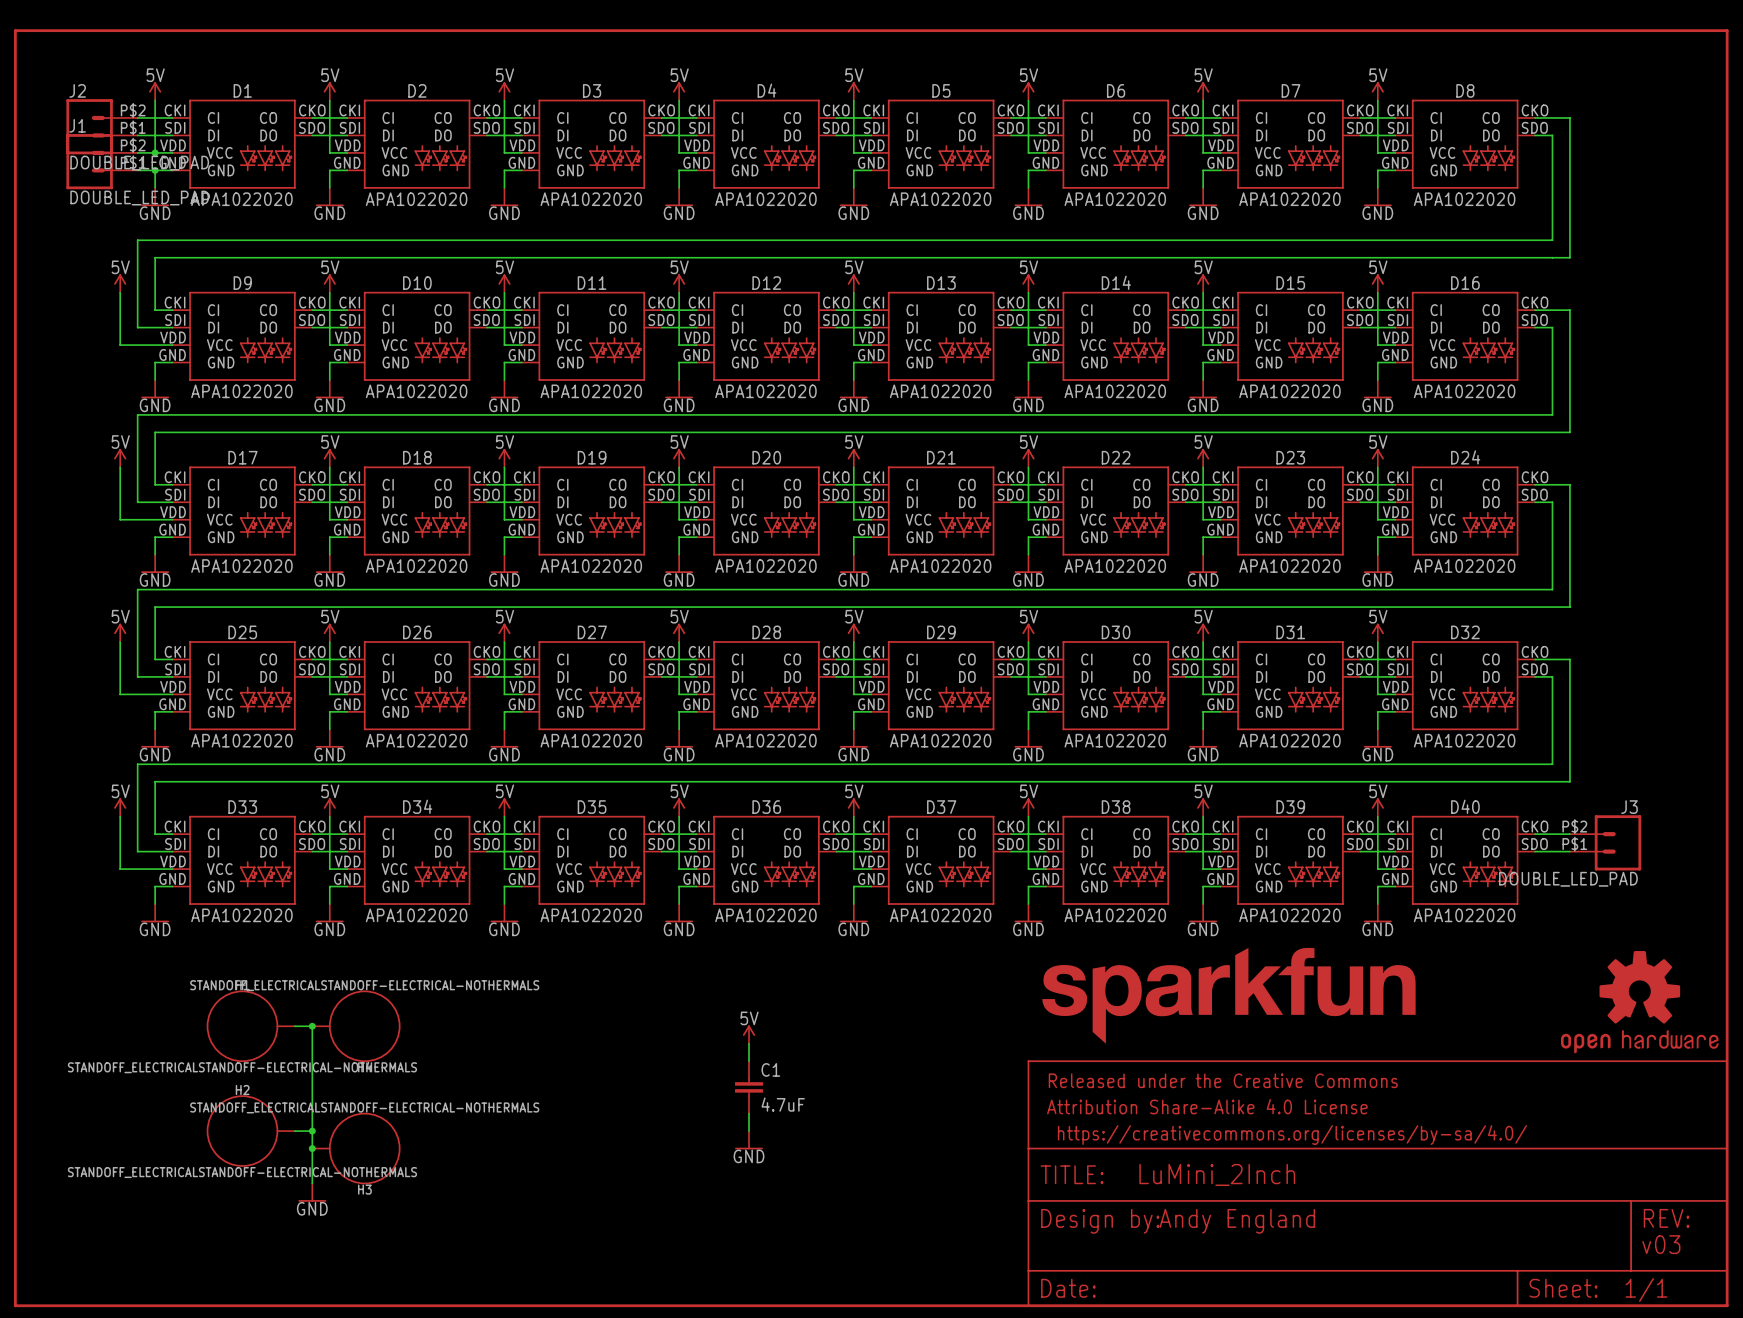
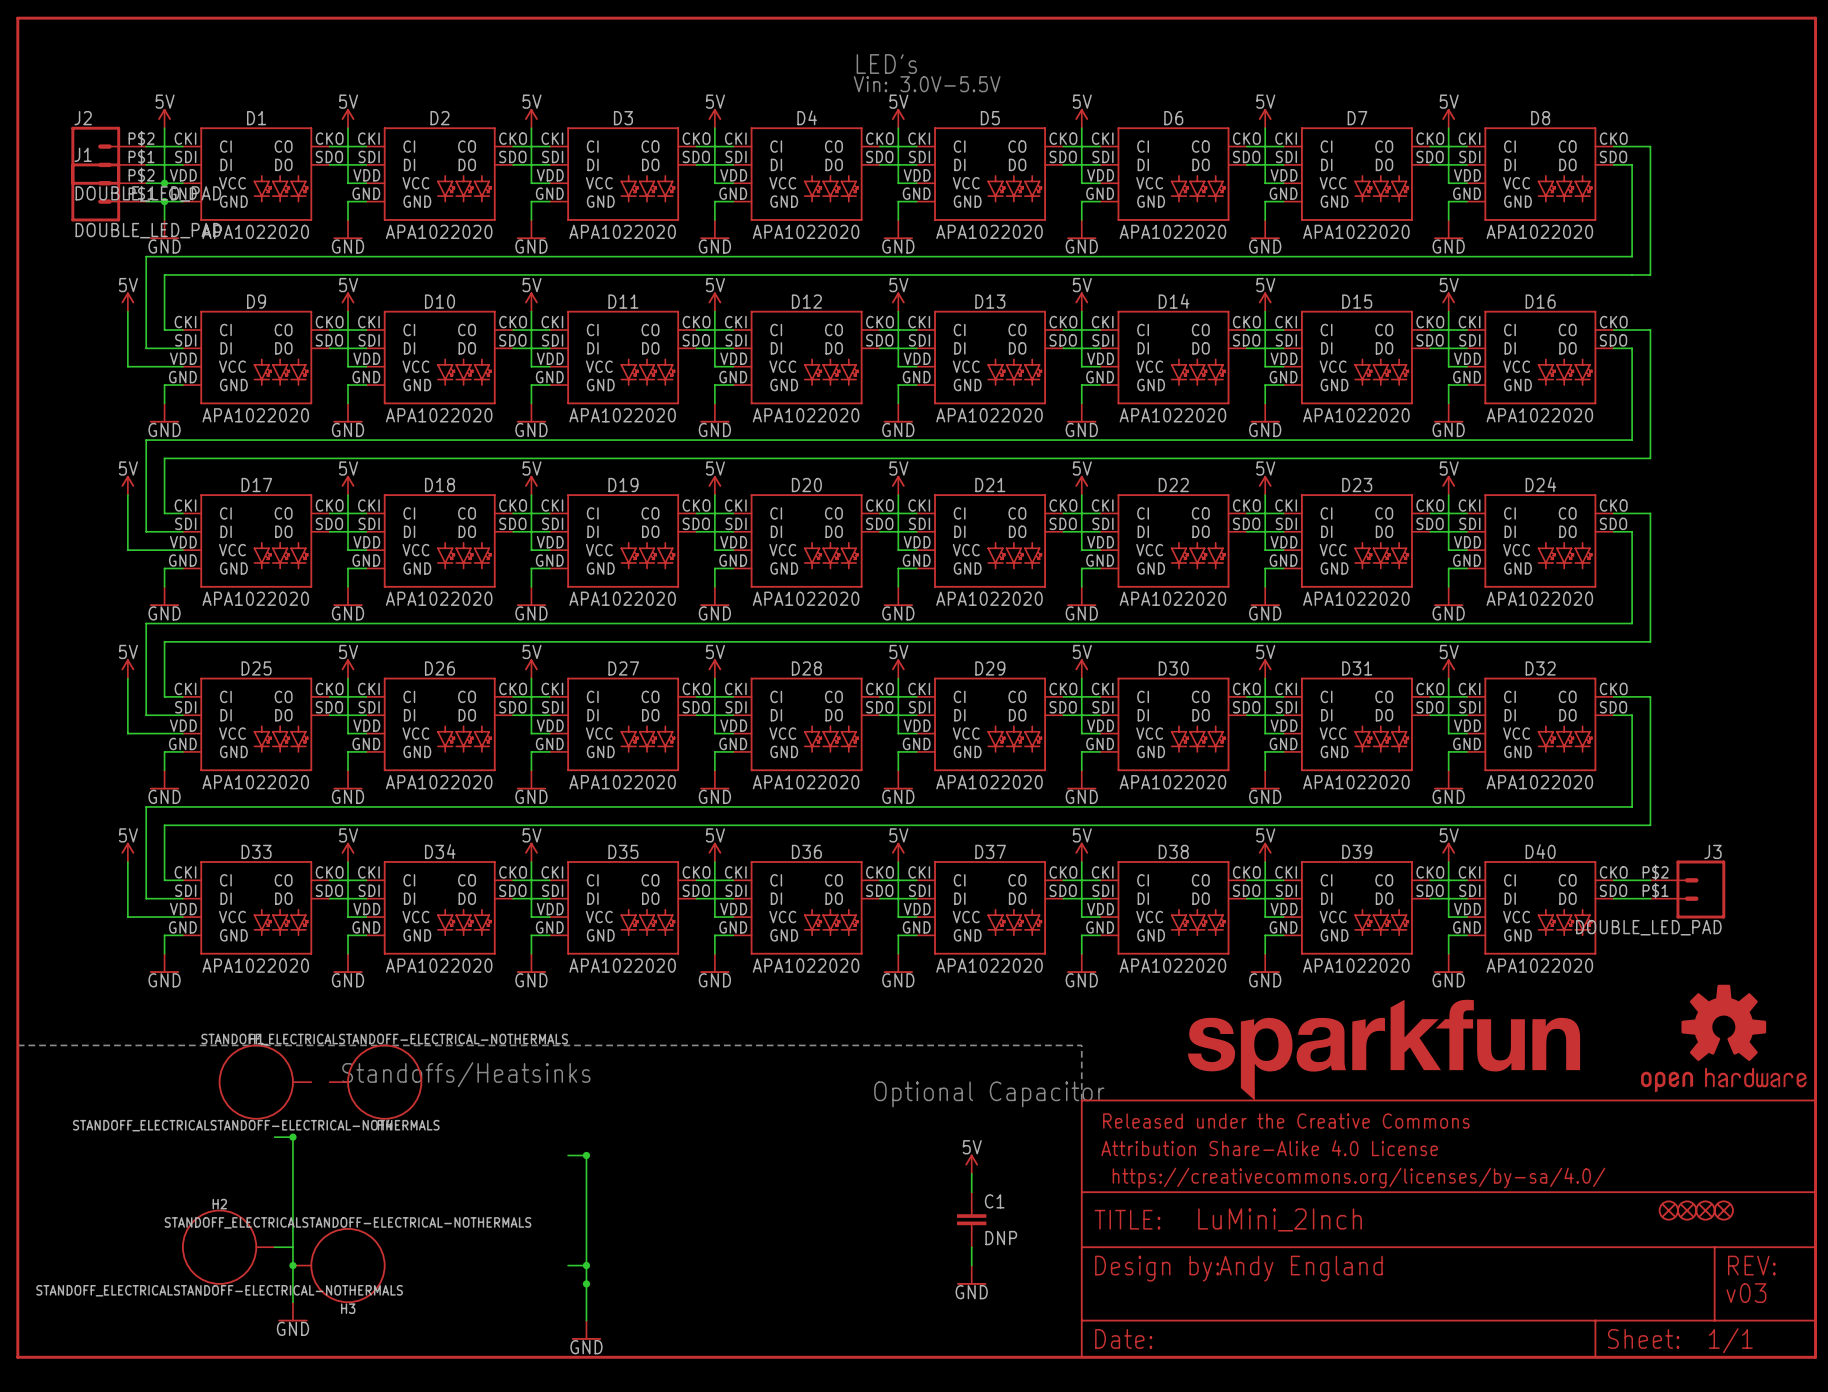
text: none -> LED's (886, 64)
text: none -> Vin: 3.0V-5.5V (927, 84)
power symbol position: 5V (155, 91) -> 5V (164, 118)
power symbol position: 5V (329, 91) -> 5V (348, 118)
power symbol position: 5V (504, 91) -> 5V (531, 118)
power symbol position: 5V (679, 91) -> 5V (714, 118)
power symbol position: 5V (853, 91) -> 5V (898, 118)
power symbol position: 5V (1028, 91) -> 5V (1081, 118)
power symbol position: 5V (1203, 91) -> 5V (1265, 118)
power symbol position: 5V (1377, 91) -> 5V (1448, 118)
wire: (137, 117) (172, 117) -> (146, 201) (182, 201)
wire: (312, 117) (347, 117) -> none
wire: (486, 117) (521, 117) -> none
wire: (661, 117) (696, 117) -> none
wire: (836, 117) (871, 117) -> none
wire: (1011, 117) (1045, 117) -> none
wire: (1185, 117) (1220, 117) -> none
wire: (1360, 117) (1395, 117) -> none
wire: (1535, 117) (1569, 117) (1569, 135) -> (1632, 146) (1650, 146)
J2 position: (102, 126) -> (108, 155)
wire: (1552, 135) (1552, 152) -> (1613, 164) (1632, 164)
D1 position: (242, 144) -> (256, 174)
D2 position: (417, 144) -> (439, 174)
D3 position: (591, 144) -> (623, 174)
D4 position: (766, 144) -> (806, 174)
D5 position: (941, 144) -> (990, 174)
D6 position: (1115, 144) -> (1173, 174)
D7 position: (1290, 144) -> (1356, 174)
D8 position: (1465, 144) -> (1540, 174)
junction position: (155, 152) -> (164, 201)
J1 position: (102, 161) -> (108, 192)
wire: (329, 170) (329, 187) -> (348, 183) (348, 164) (329, 164)
wire: (504, 170) (504, 187) -> (531, 183) (531, 164) (513, 164)
wire: (679, 170) (679, 187) -> (714, 183) (714, 164) (696, 164)
wire: (853, 170) (853, 187) -> (898, 183) (898, 164) (879, 164)
wire: (1028, 170) (1028, 187) -> (1081, 183) (1081, 164) (1063, 164)
wire: (1203, 170) (1203, 187) -> (1265, 183) (1265, 164) (1246, 164)
wire: (1377, 170) (1377, 187) -> (1448, 183) (1448, 164) (1430, 164)
power symbol position: GND (155, 197) -> GND (164, 229)
power symbol position: GND (329, 197) -> GND (348, 229)
power symbol position: GND (504, 197) -> GND (531, 229)
power symbol position: GND (679, 197) -> GND (714, 229)
power symbol position: GND (853, 197) -> GND (898, 229)
power symbol position: GND (1028, 197) -> GND (1081, 229)
power symbol position: GND (1203, 197) -> GND (1265, 229)
power symbol position: GND (1377, 197) -> GND (1448, 229)
part position: (871, 668) -> (916, 687)
line: none -> (17, 1045) (1081, 1045) (1081, 1100)
part position: (1228, 995) -> (1384, 1050)
part position: (1639, 1002) -> (1723, 1038)
text: none -> Standoffs/Heatsinks (466, 1074)
wire: (294, 1026) (312, 1026) (312, 1183) -> (274, 1137) (292, 1137) (292, 1302)
junction: (312, 1026) -> none
power symbol: 5V (749, 1034) -> none
text: none -> Optional Capacitor (989, 1094)
wire: (749, 1043) (749, 1061) -> none
junction: none -> (292, 1137)
C1 position: (749, 1087) -> (971, 1219)
wire: none -> (568, 1155) (586, 1155) (586, 1320)
junction: none -> (586, 1155)
C1 value: 4.7uF (783, 1104) -> DNP (1001, 1238)
power symbol: none -> 5V (971, 1164)
wire: (749, 1113) (749, 1131) -> none
wire: none -> (971, 1173) (971, 1192)
H2 position: (250, 1131) -> (228, 1247)
wire: (294, 1131) (312, 1131) -> (274, 1247) (292, 1247)
junction: (312, 1131) -> none
power symbol: GND (749, 1140) -> none
junction: (312, 1148) -> none
H3 position: (356, 1148) -> (339, 1265)
part: none -> (1668, 1210)
part: none -> (1687, 1210)
part: none -> (1705, 1210)
part: none -> (1723, 1210)
wire: none -> (971, 1247) (971, 1265)
part position: (1377, 1183) -> (1448, 1228)
power symbol position: GND (312, 1192) -> GND (292, 1311)
junction: none -> (292, 1265)
wire: none -> (568, 1265) (586, 1265)
junction: none -> (586, 1265)
power symbol: none -> GND (971, 1275)
junction: none -> (586, 1283)
text position: Andy England (1237, 1221) -> Andy England (1301, 1268)
text position: v03 (1661, 1244) -> v03 (1746, 1293)
power symbol: none -> GND (586, 1330)

